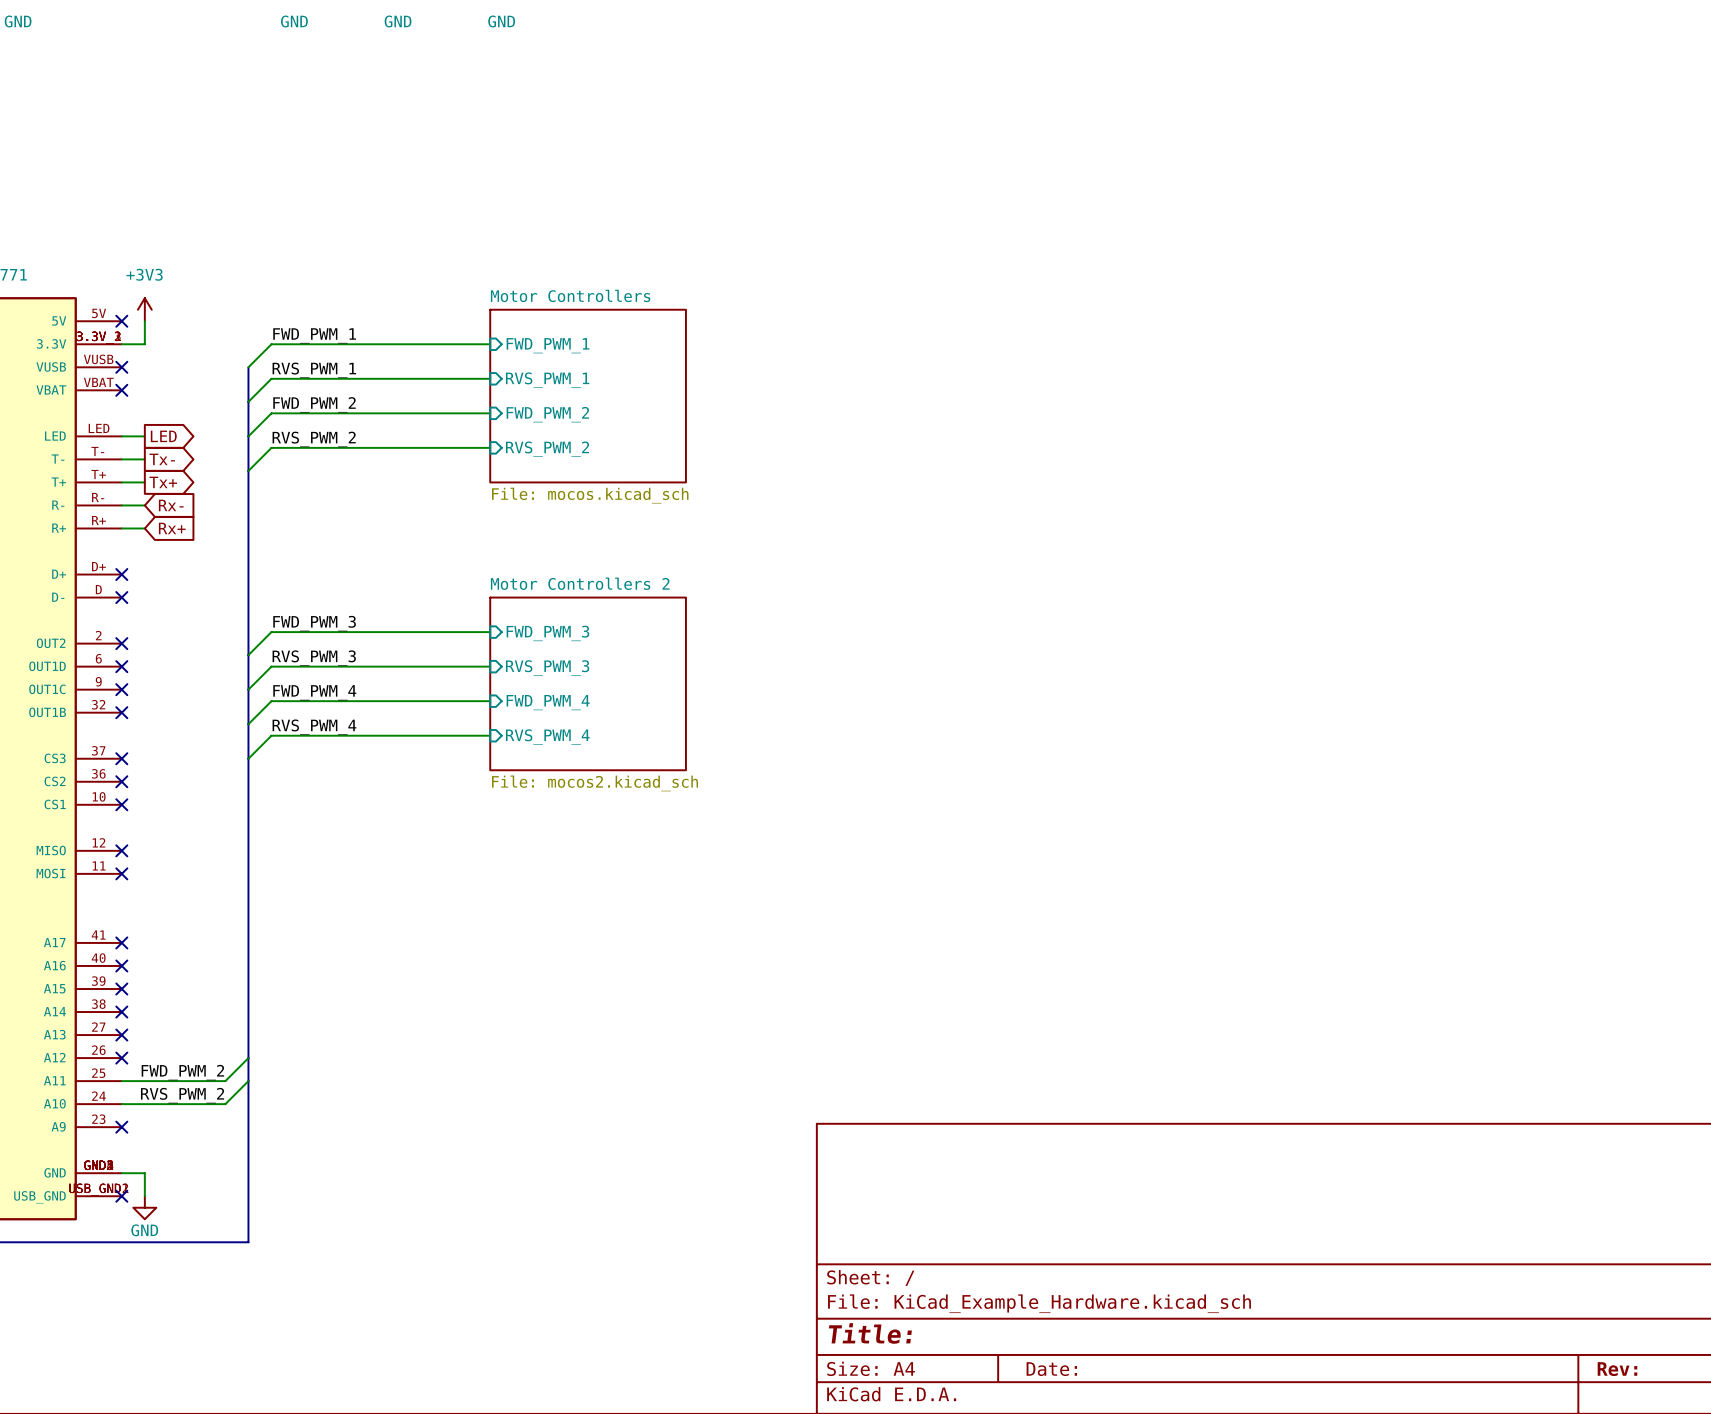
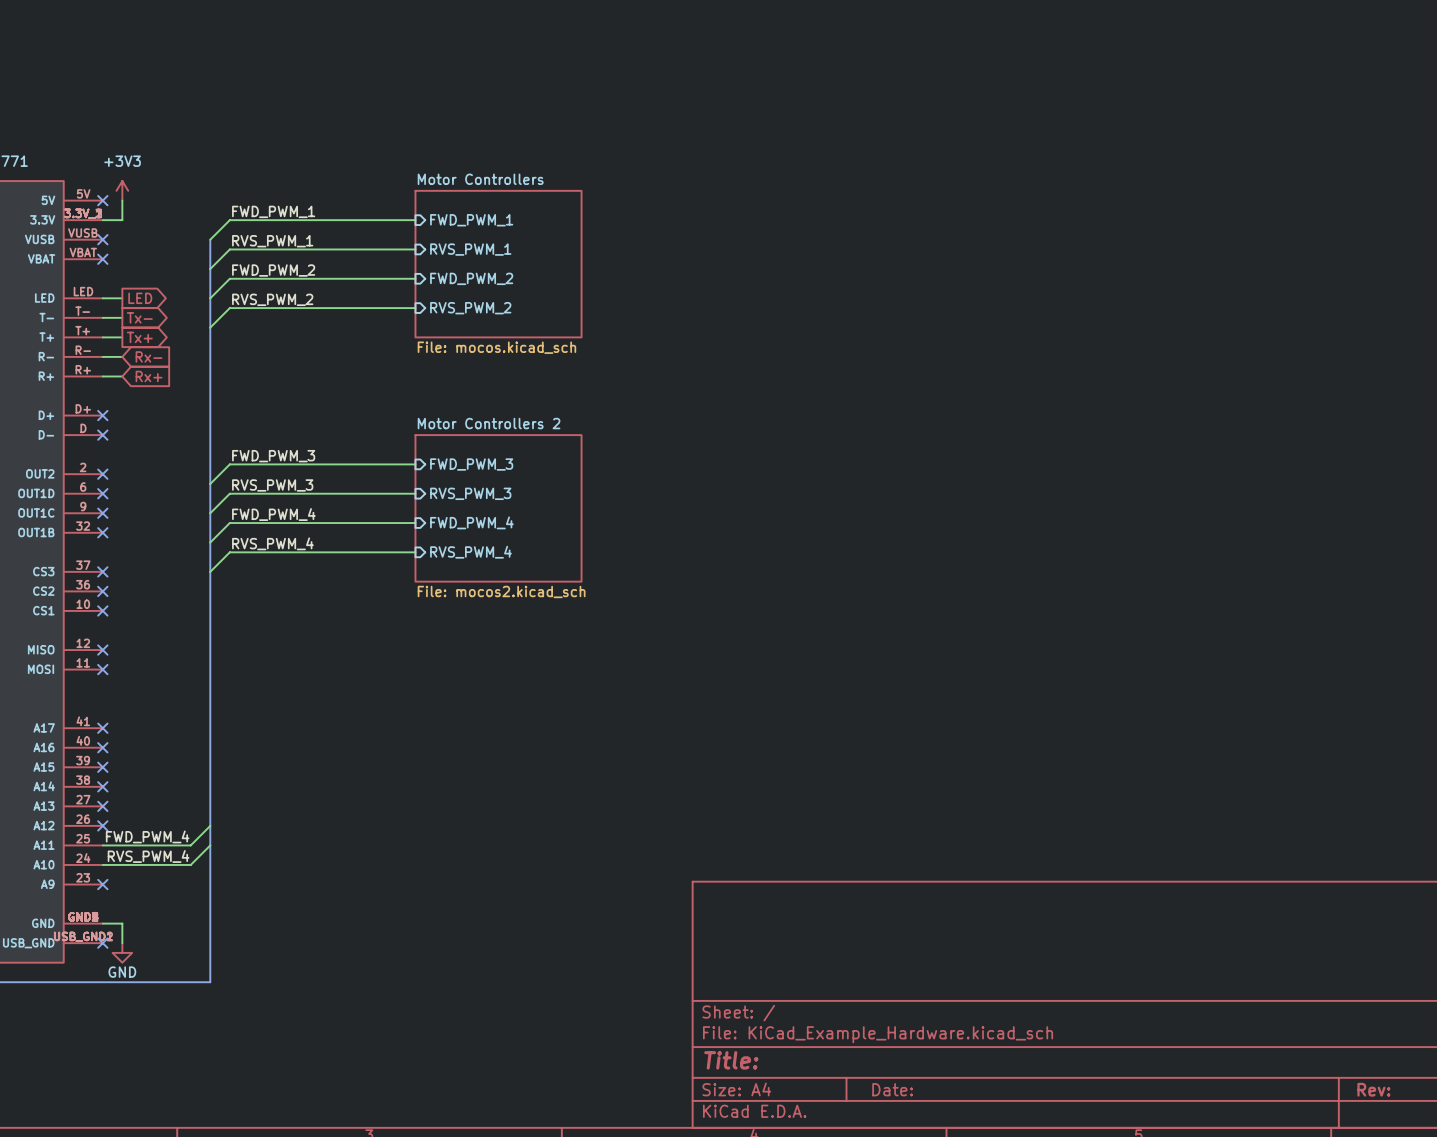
label: FWD_PWM_2 (182, 1072) -> FWD_PWM_4 (147, 836)
label: RVS_PWM_2 (182, 1095) -> RVS_PWM_4 (148, 856)

